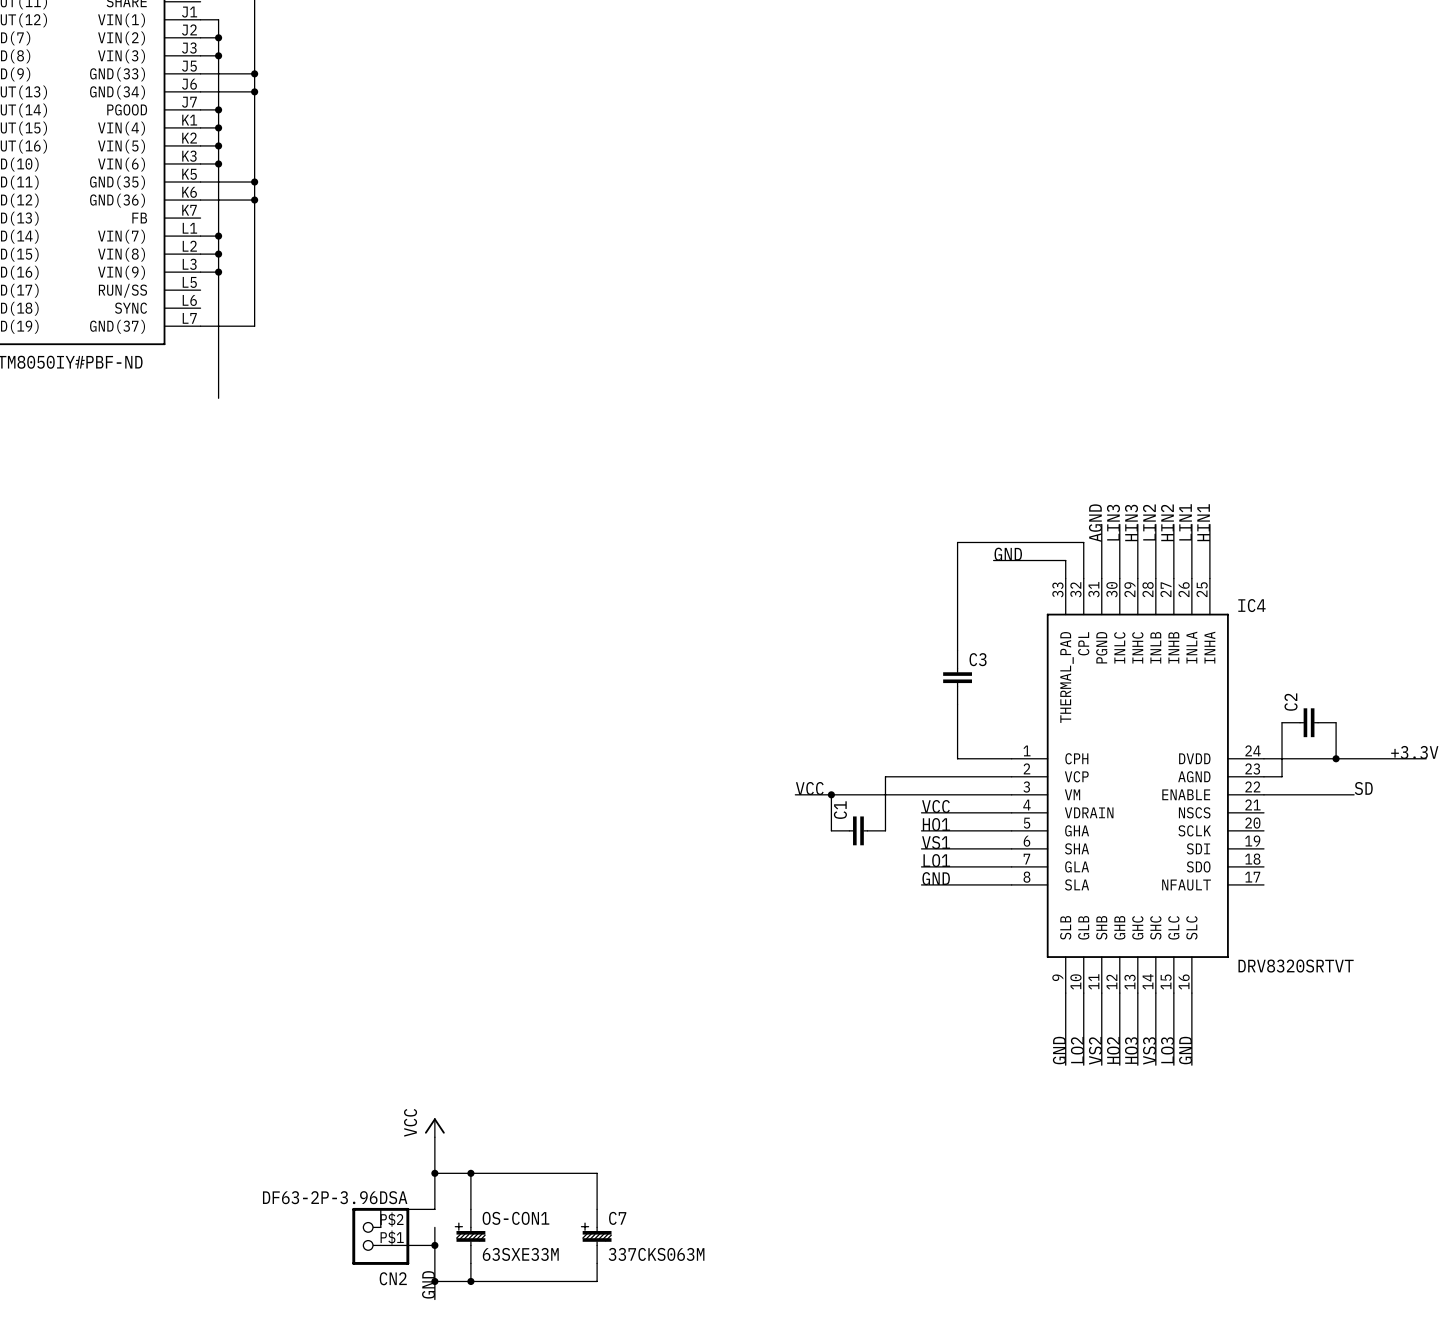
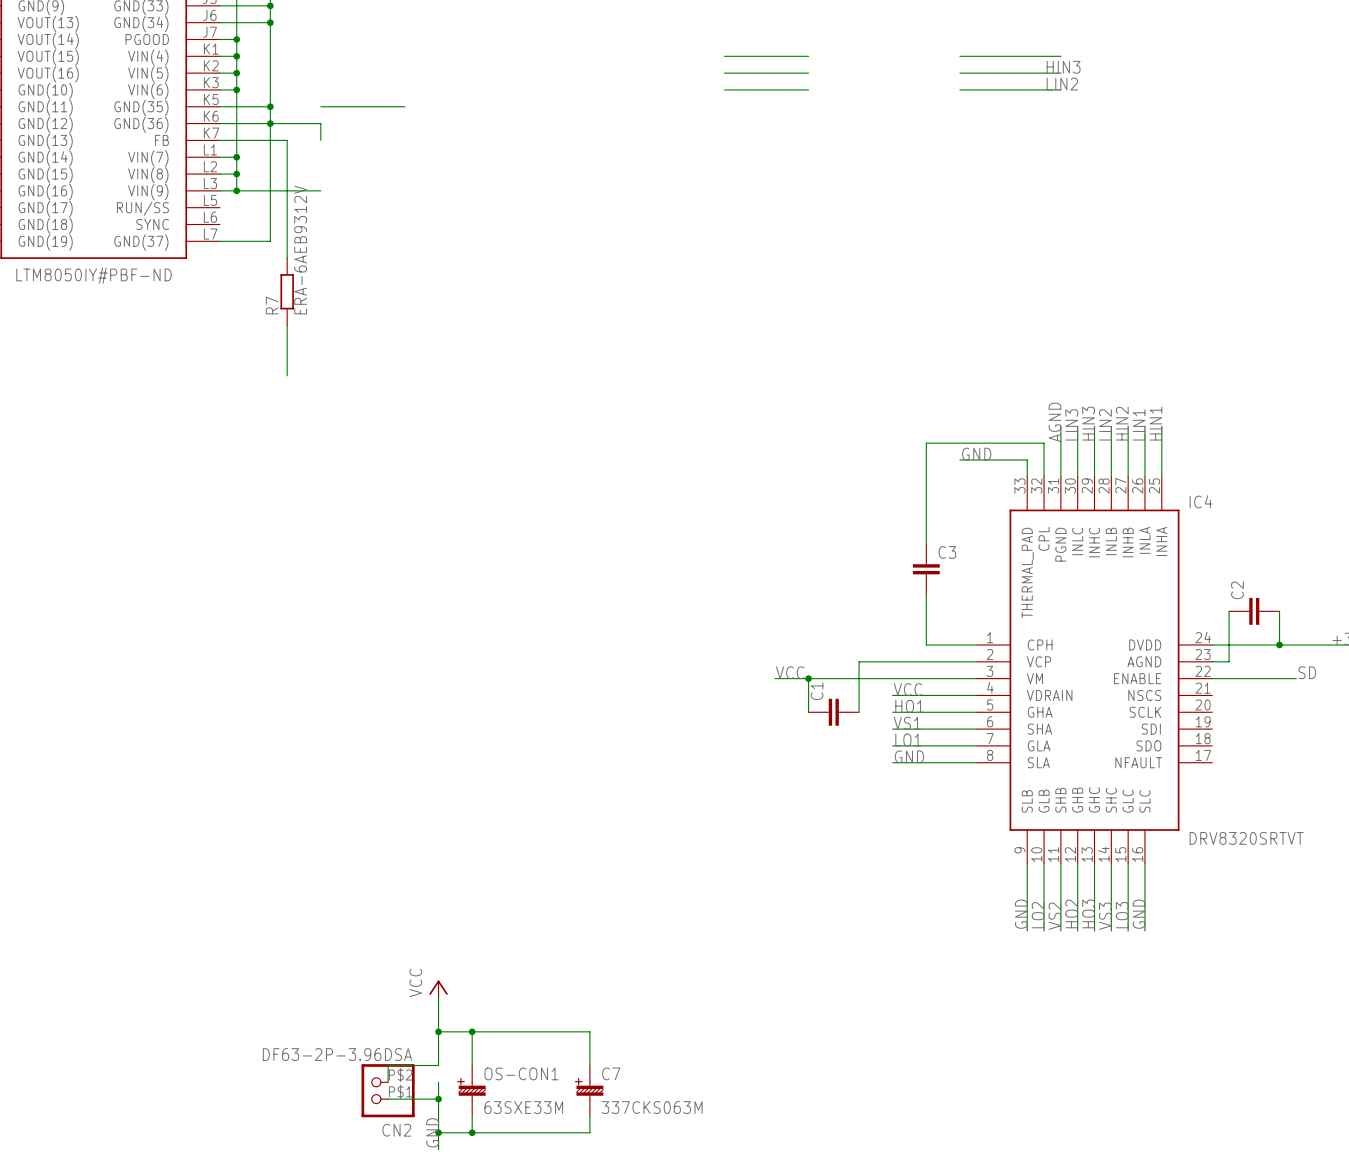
wire: none -> (724, 56) (808, 56)
wire: none -> (959, 56) (1060, 56)
label: none -> HIN3 (1063, 67)
wire: none -> (724, 73) (808, 73)
wire: none -> (959, 73) (1060, 73)
label: none -> LIN2 (1062, 84)
wire: none -> (724, 89) (808, 89)
wire: none -> (959, 89) (1060, 89)
wire: none -> (320, 106) (404, 106)
wire: none -> (270, 123) (320, 123) (320, 140)
wire: none -> (219, 140) (287, 140) (287, 258)
wire: (218, 272) (218, 398) -> (236, 190) (320, 190)
R7: none -> ERA-6AEB9312V (287, 291)
wire: none -> (287, 325) (287, 375)

